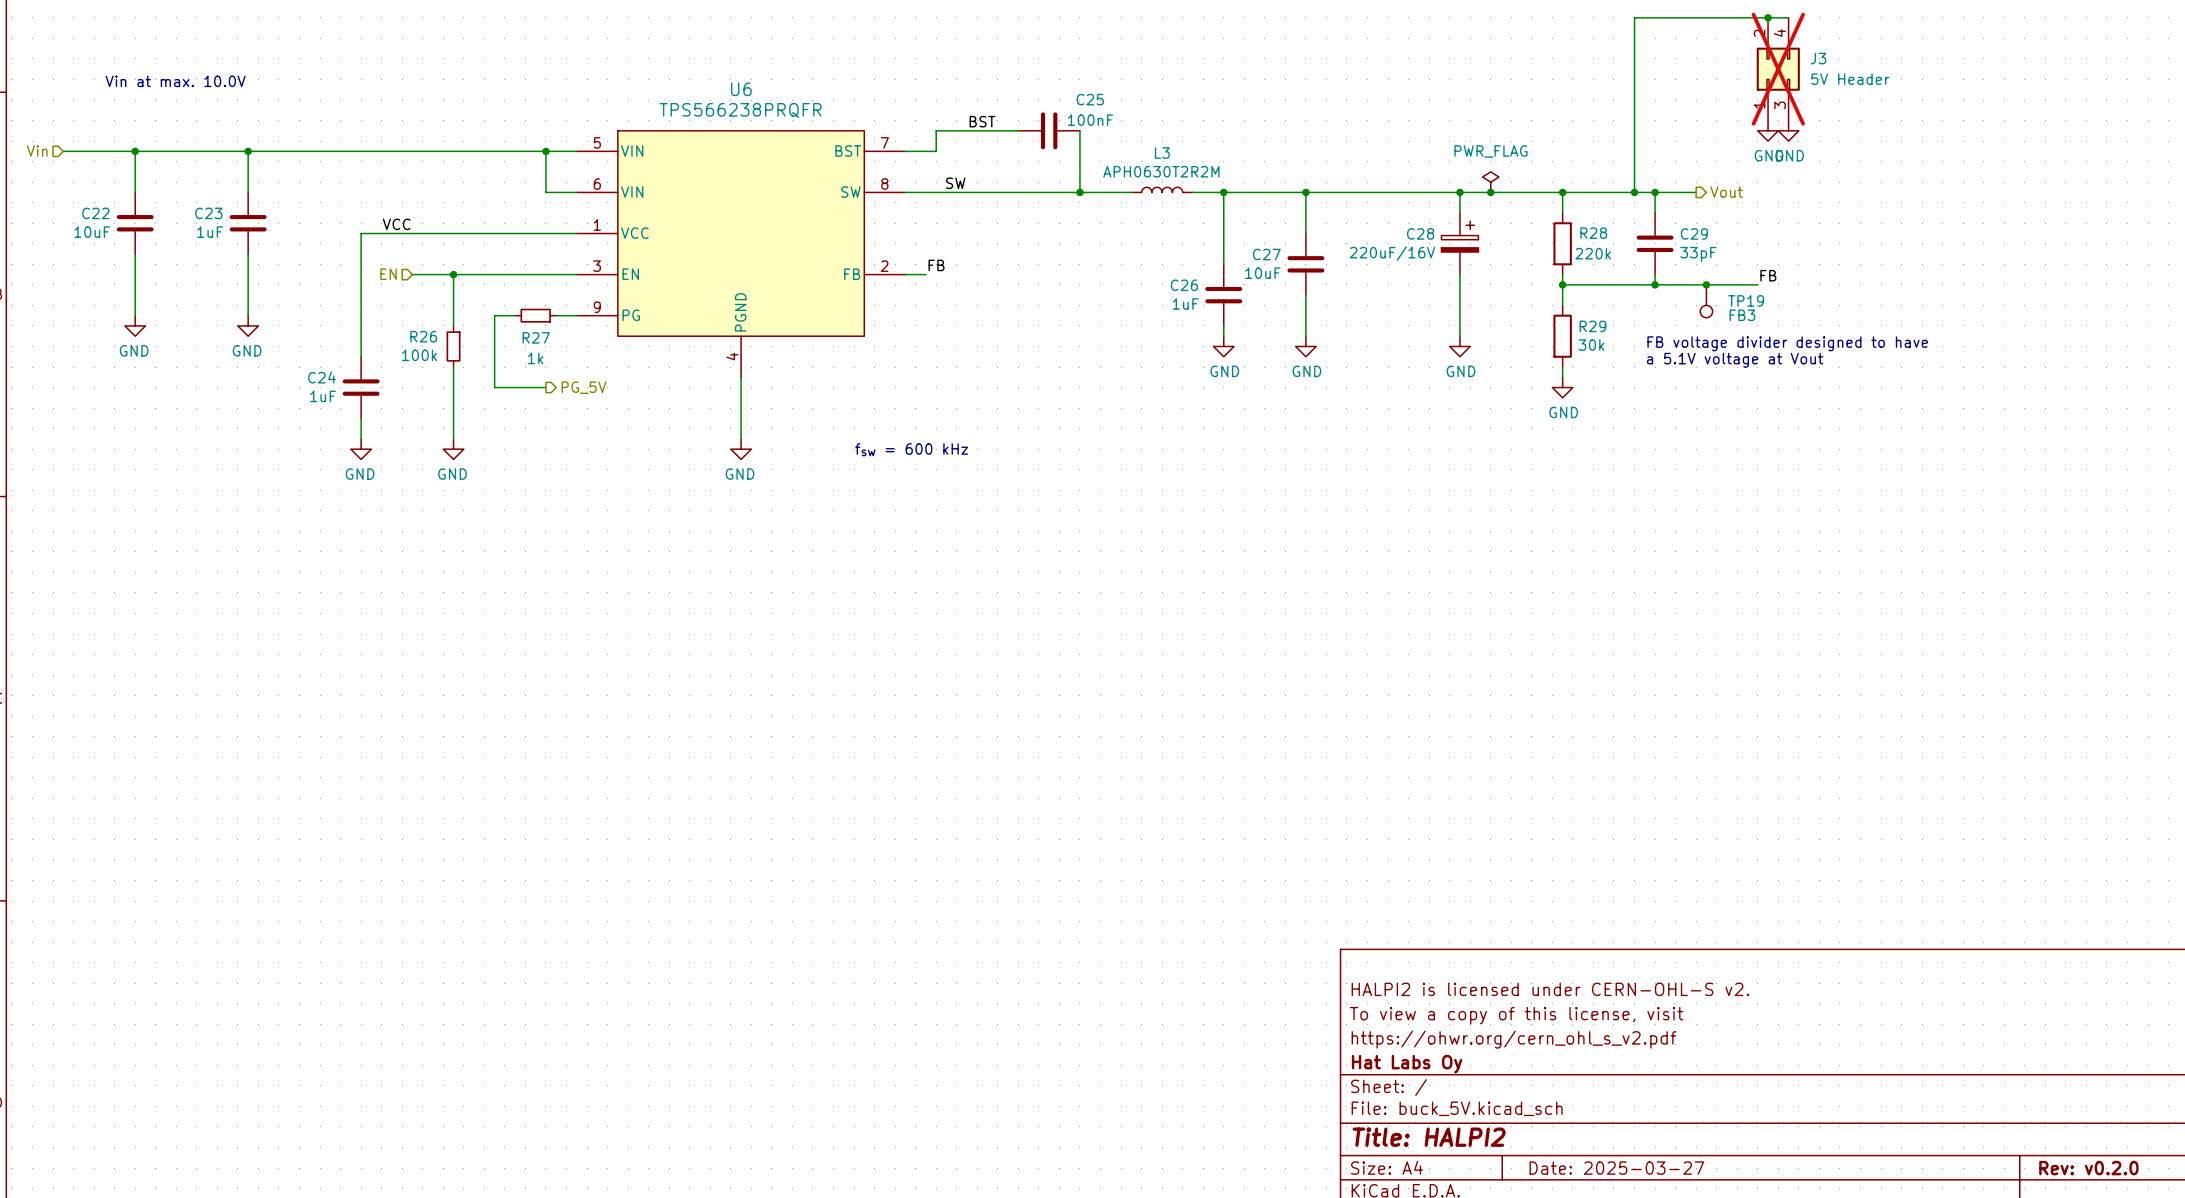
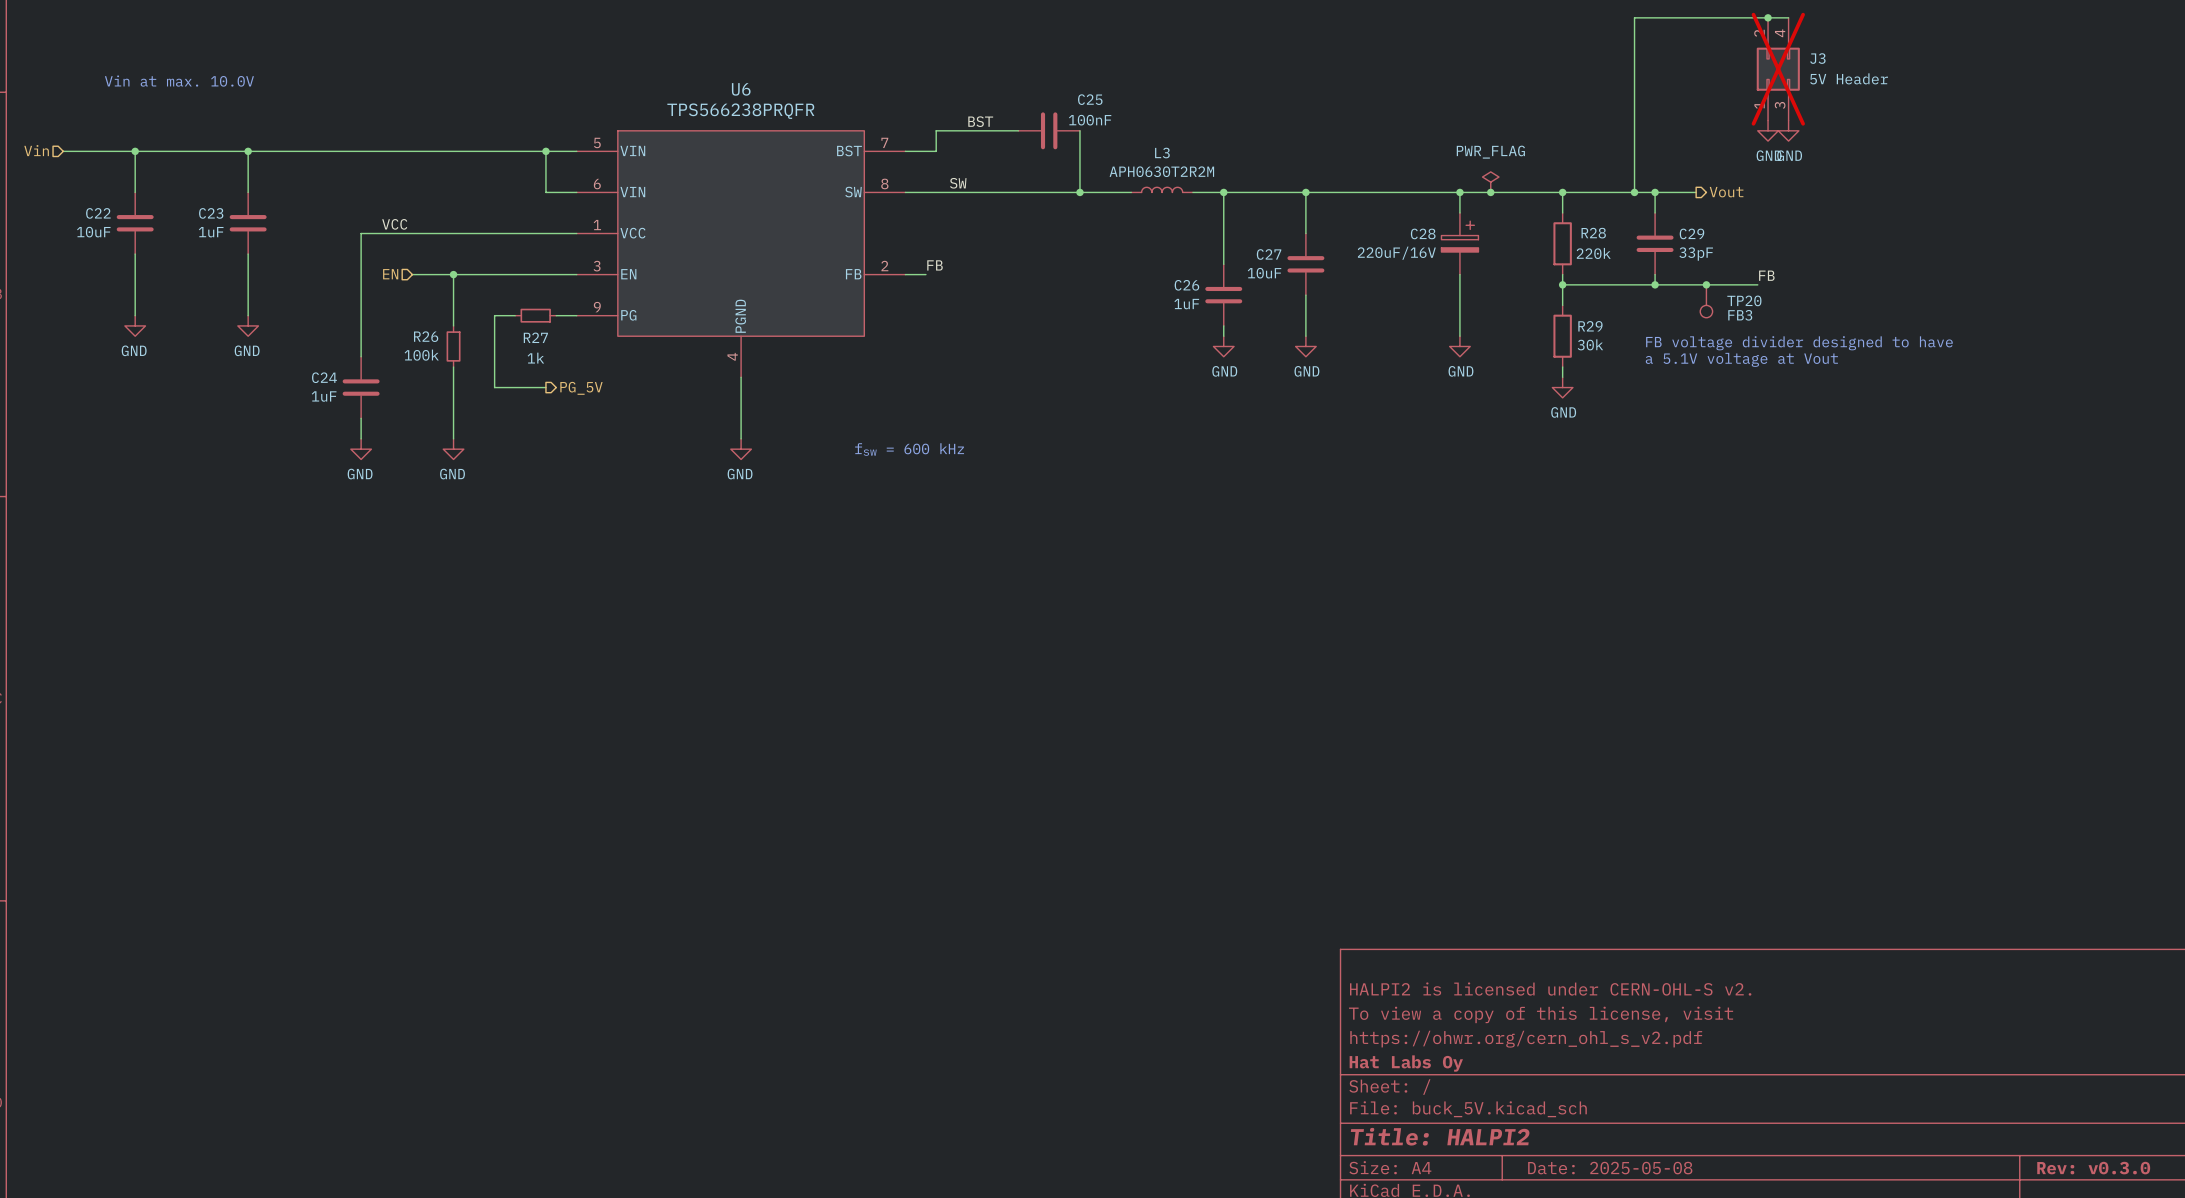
TP19 name: TP19 (1746, 300) -> TP20 (1744, 300)
title block: Date: 2025-03-27 (1616, 1168) -> Date: 2025-05-08 (1610, 1168)
title block: Rev: v0.2.0 (2088, 1168) -> Rev: v0.3.0 (2093, 1168)

